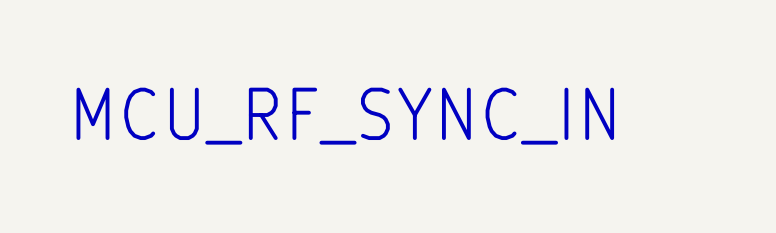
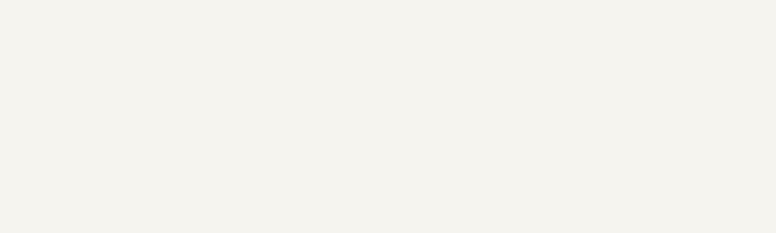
text: MCU_RF_SYNC_IN (345, 116) -> none

